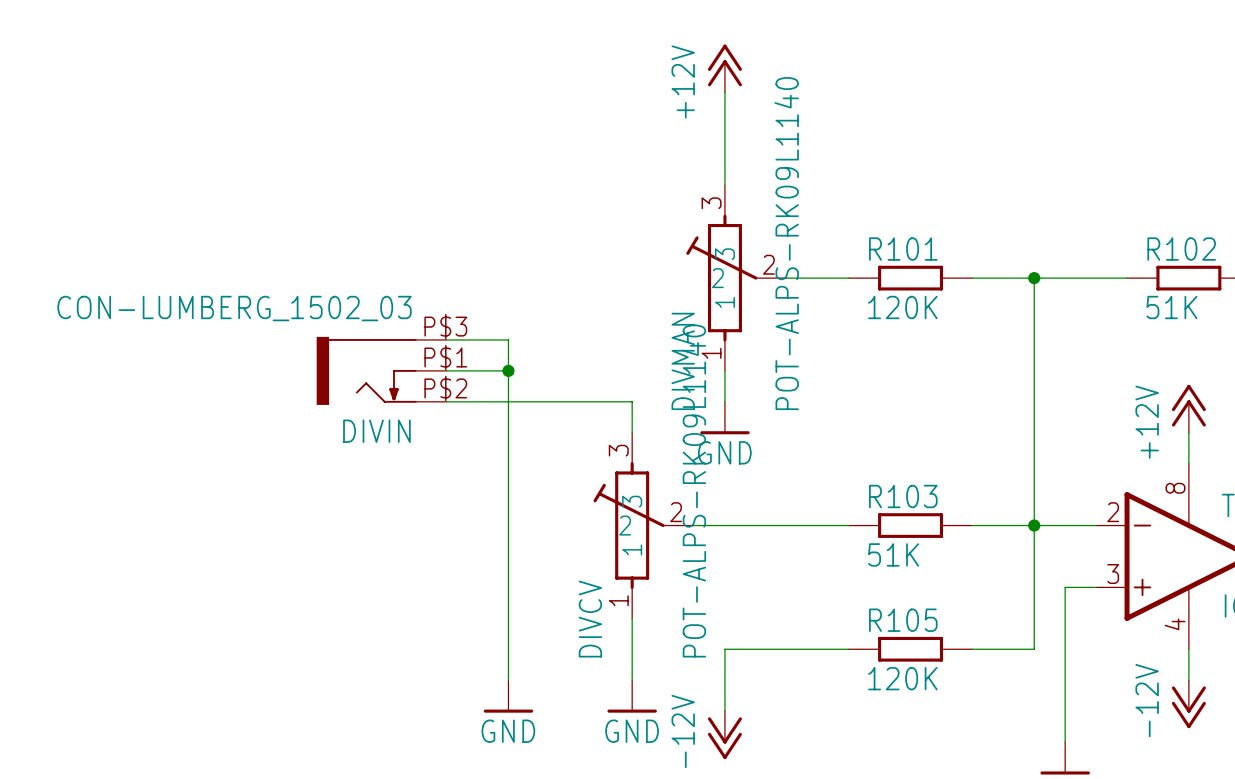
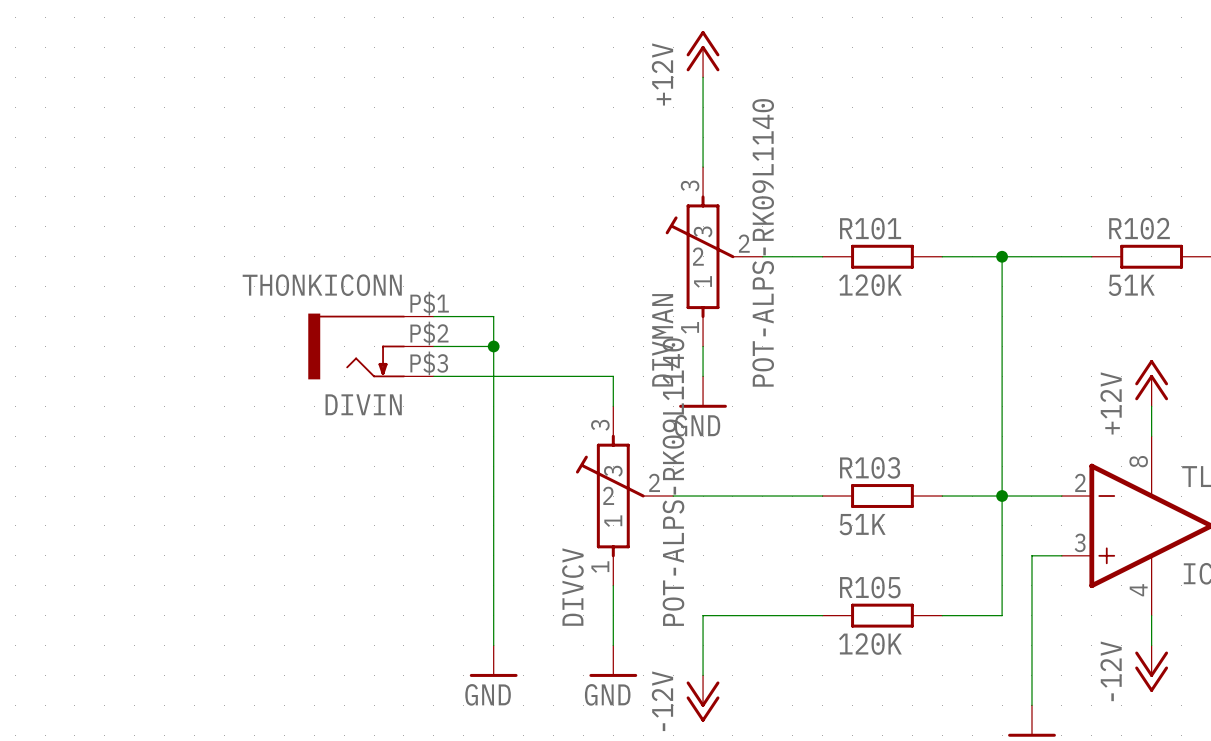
DIVIN value: CON-LUMBERG_1502_03 (234, 308) -> THONKICONN (322, 285)
DIVIN pin number: P$3 (445, 326) -> P$1 (429, 303)
DIVIN pin number: P$1 (445, 357) -> P$2 (429, 333)
DIVIN pin number: P$2 (445, 388) -> P$3 (429, 363)

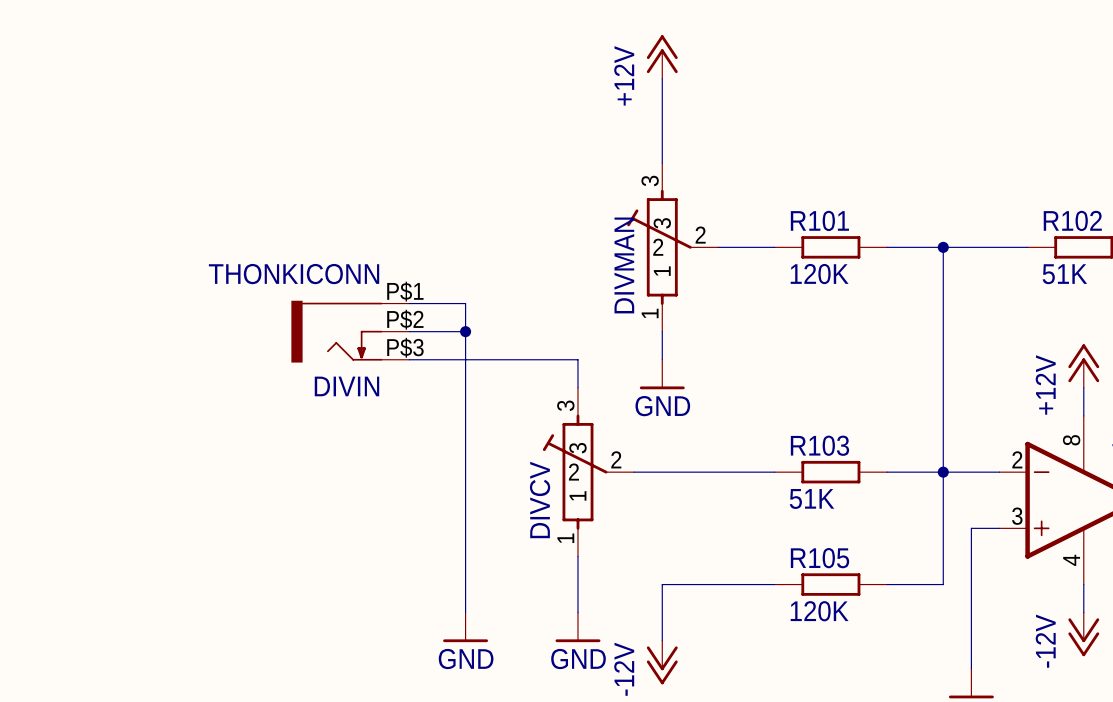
DIVMAN value: POT-ALPS-RK09L1140 (763, 242) -> none
DIVMAN name position: DIVMAN (662, 340) -> DIVMAN (624, 265)
DIVCV value: POT-ALPS-RK09L1140 (673, 482) -> none
DIVCV name position: DIVCV (572, 587) -> DIVCV (540, 499)

